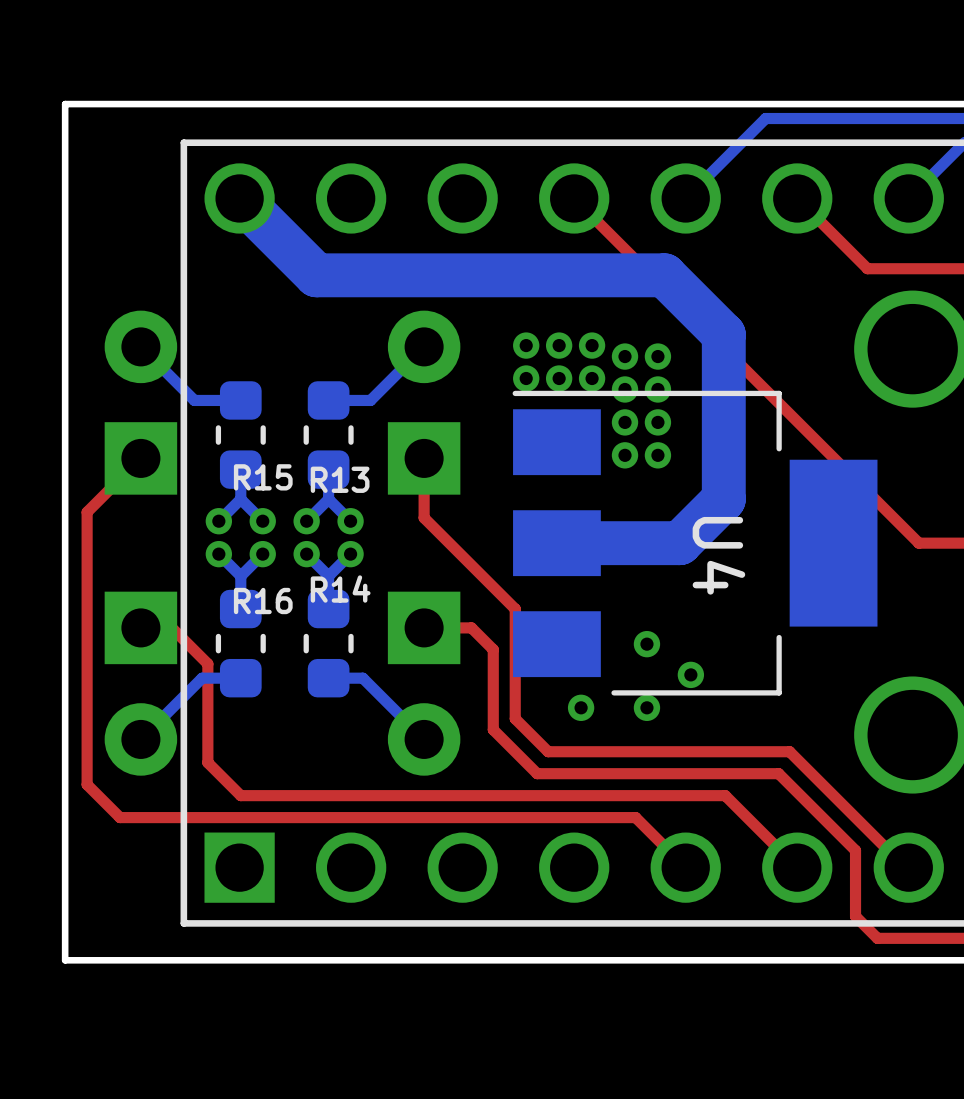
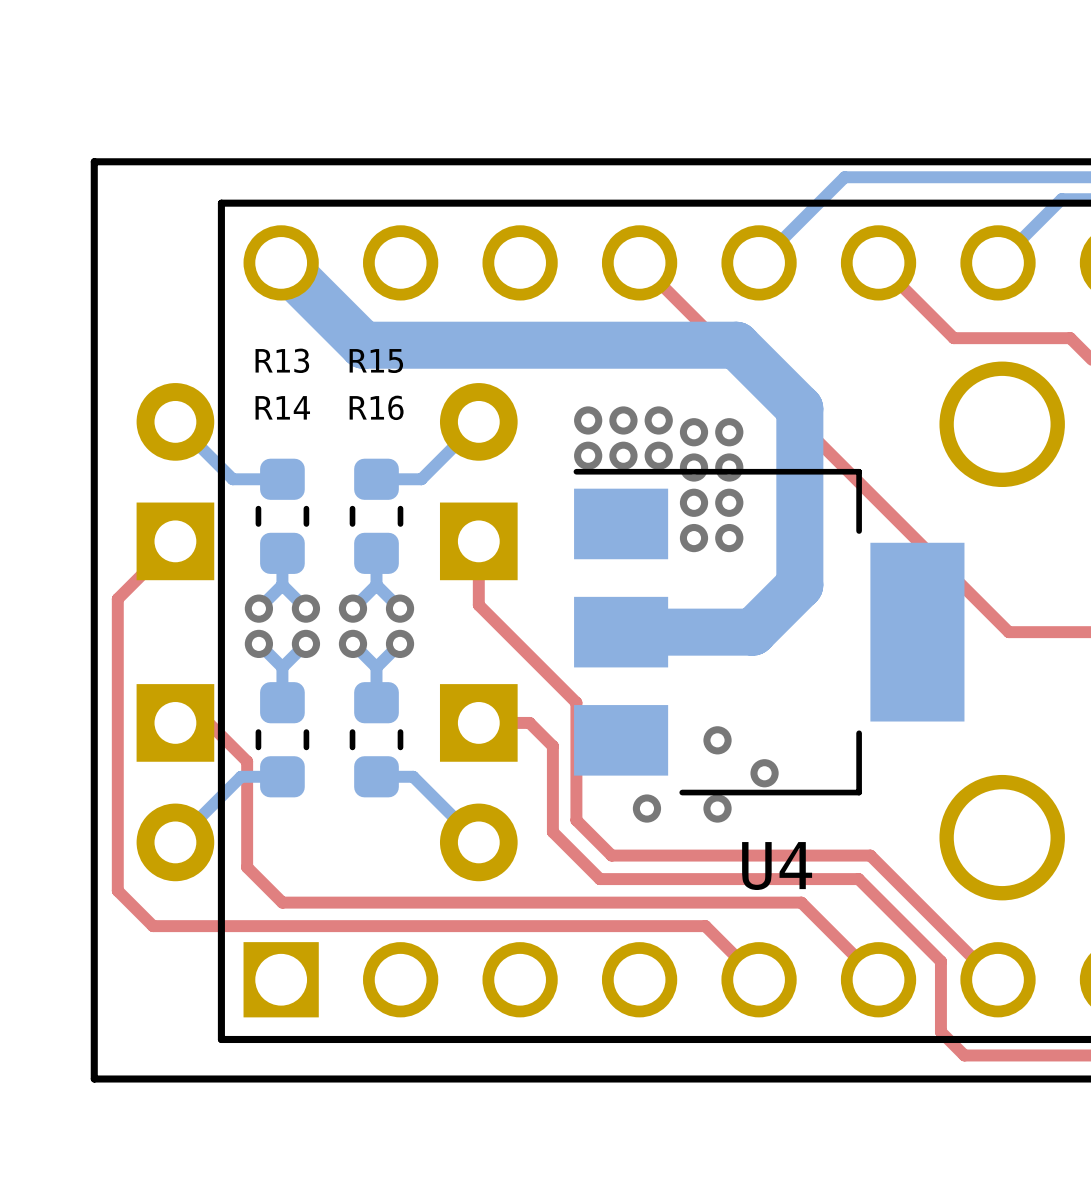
R15 name position: R15 (263, 477) -> R15 (376, 361)
R13 name position: R13 (340, 479) -> R13 (282, 360)
U4 name rotation: 0° (718, 555) -> 90° counterclockwise (777, 866)
U4 name position: U4 (718, 555) -> U4 (777, 866)
R14 name position: R14 (340, 589) -> R14 (282, 407)
R16 name position: R16 (263, 601) -> R16 (376, 407)

